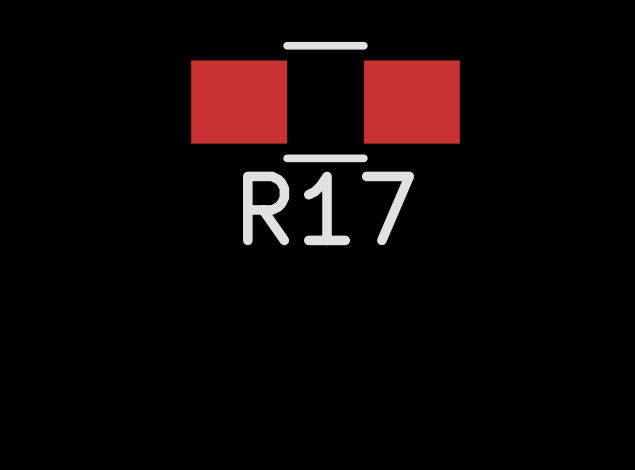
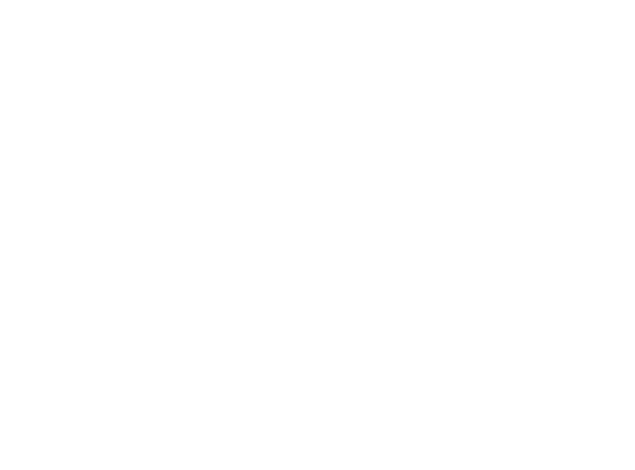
R17: (325, 102) -> none

